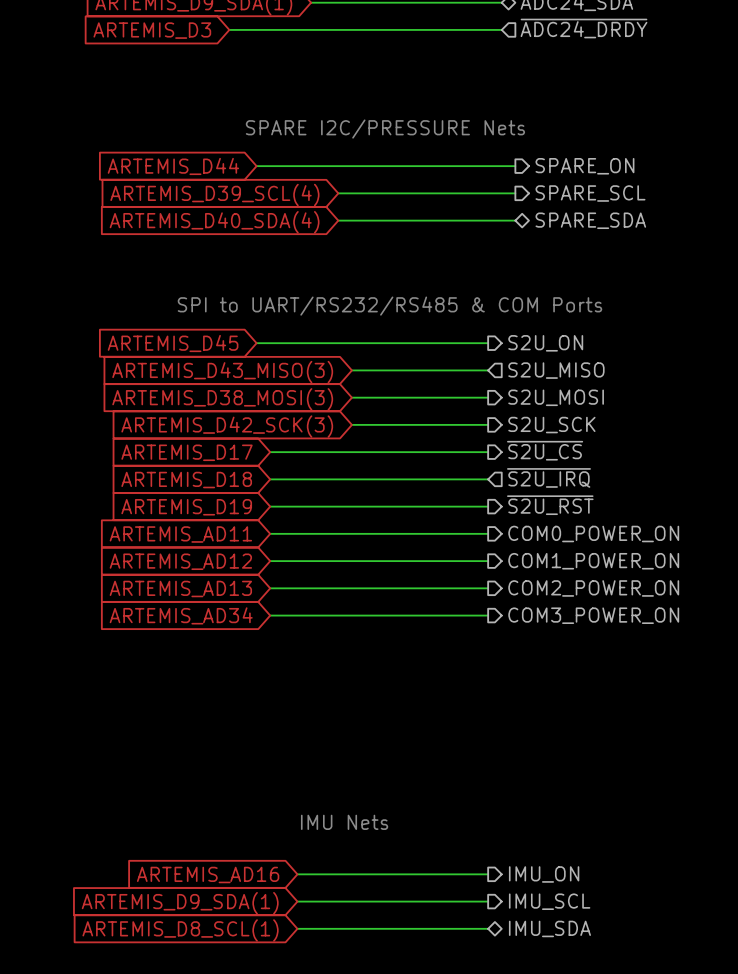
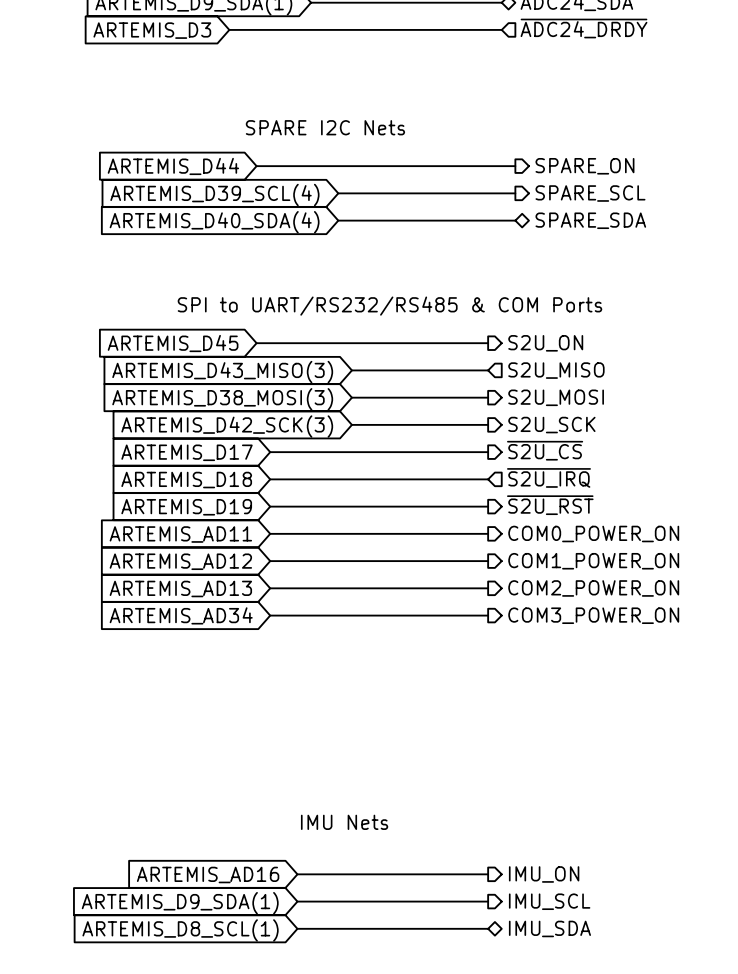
text: SPARE I2C/PRESSURE Nets (385, 129) -> SPARE I2C Nets (325, 127)

